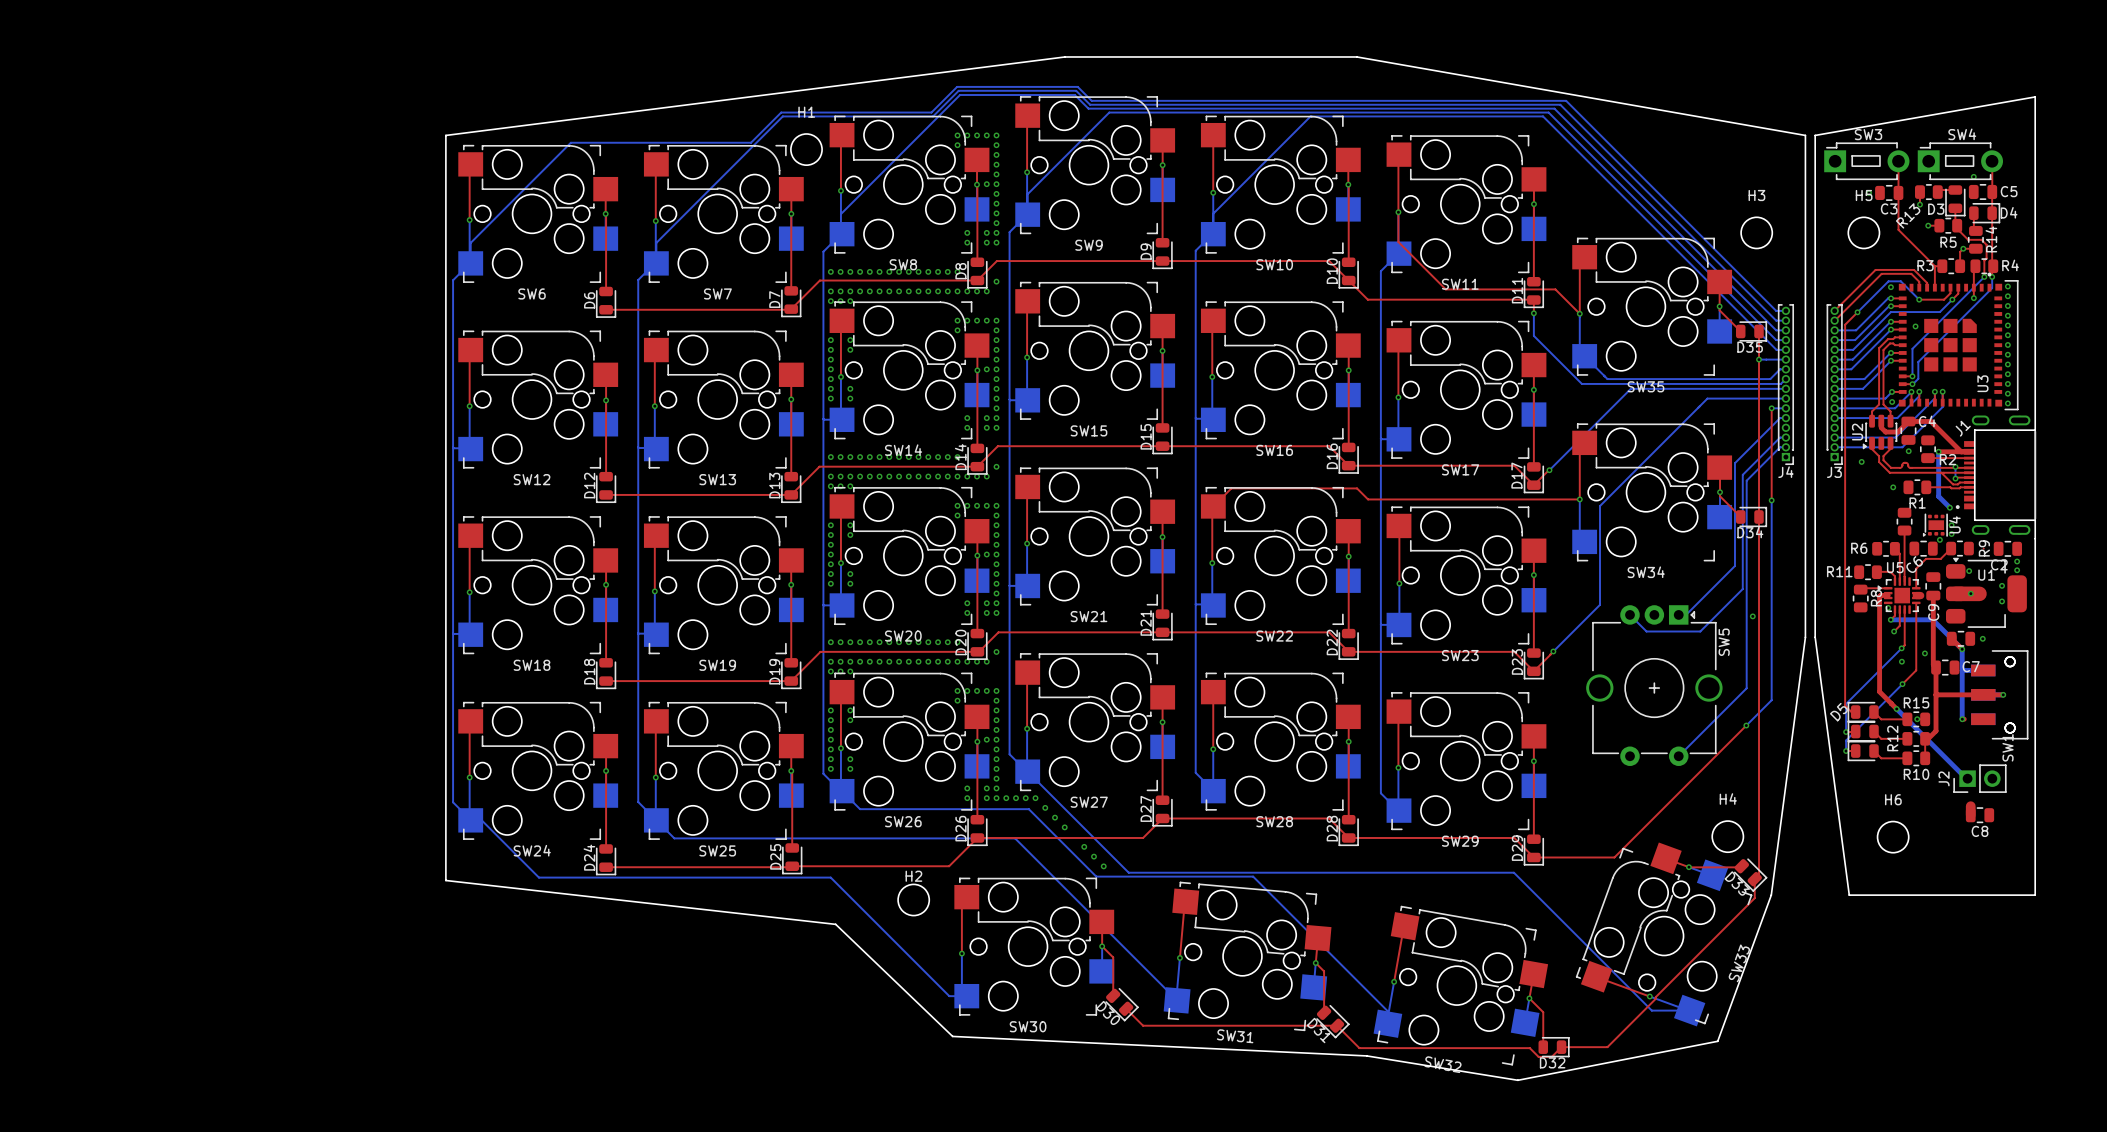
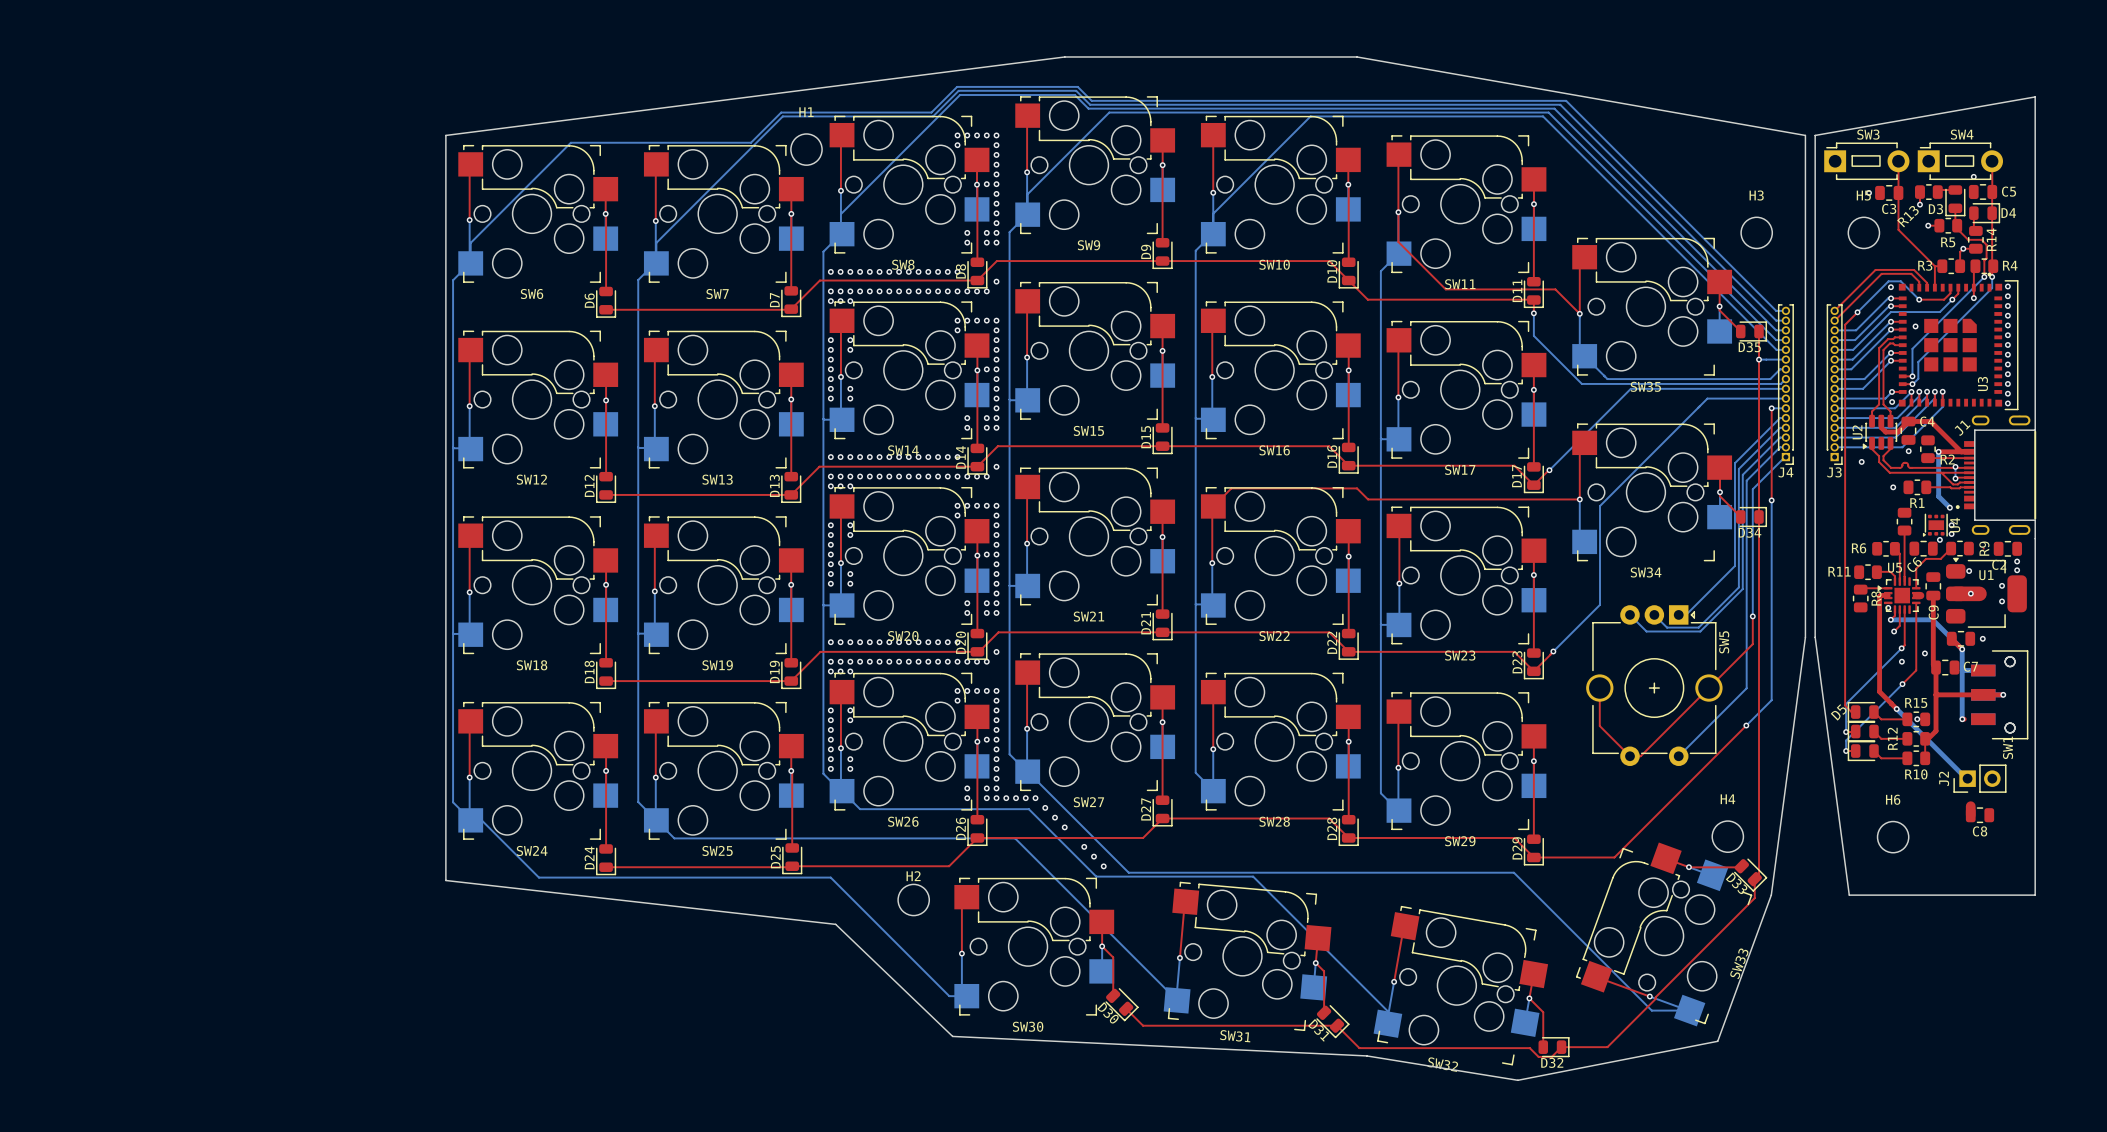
top track: none -> (1927, 391) (1927, 402)
bottom track: none -> (1927, 391) (1927, 396) (1895, 427) (1834, 427)
via: none -> (1927, 391)
bottom track: none -> (1785, 427) (1780, 427) (1738, 469) (1738, 587) (1698, 627) (1667, 627) (1654, 614)
bottom track: none -> (1785, 457) (1752, 489) (1752, 616)
top track: none -> (1752, 616) (1752, 644) (1640, 756) (1630, 756) (1599, 726) (1599, 688)

